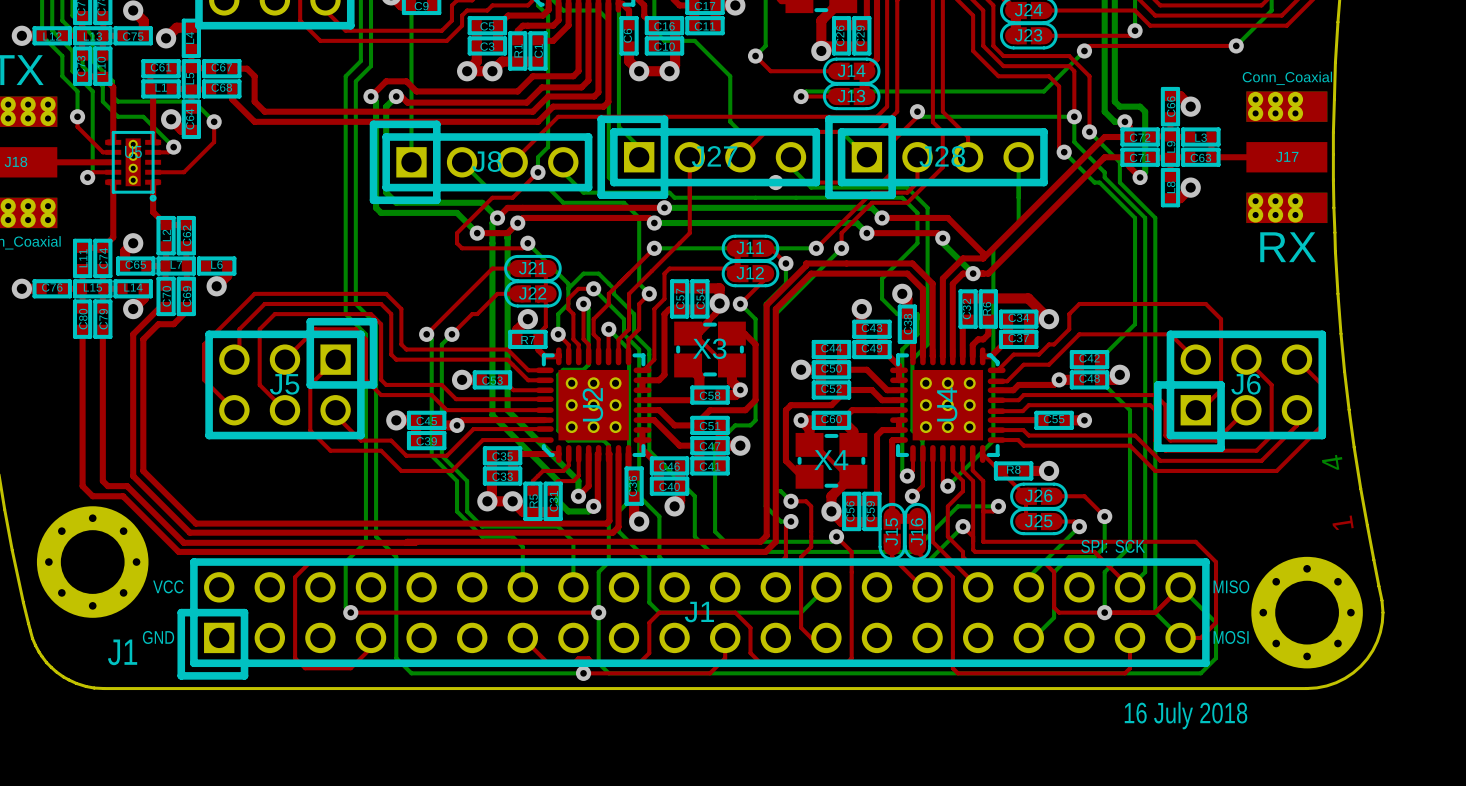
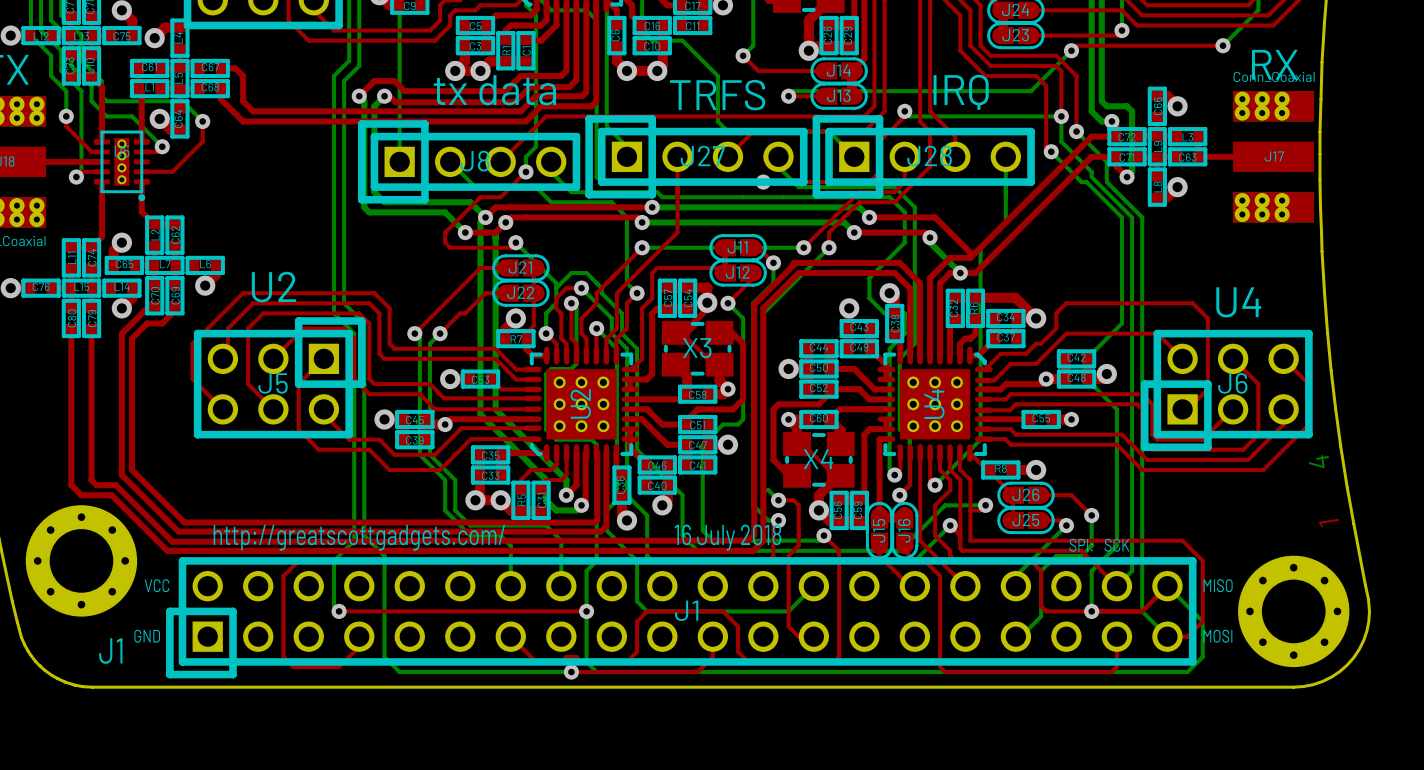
text: none -> tx data (494, 90)
text: none -> IRQ (961, 92)
text: none -> TRFS (717, 95)
text position: RX (1288, 247) -> RX (1274, 64)
text: none -> U2 (274, 287)
text: none -> U4 (1238, 302)
text: none -> http://greatscottgadgets.com/ (359, 537)
text position: 16 July 2018 (1186, 715) -> 16 July 2018 (727, 537)

